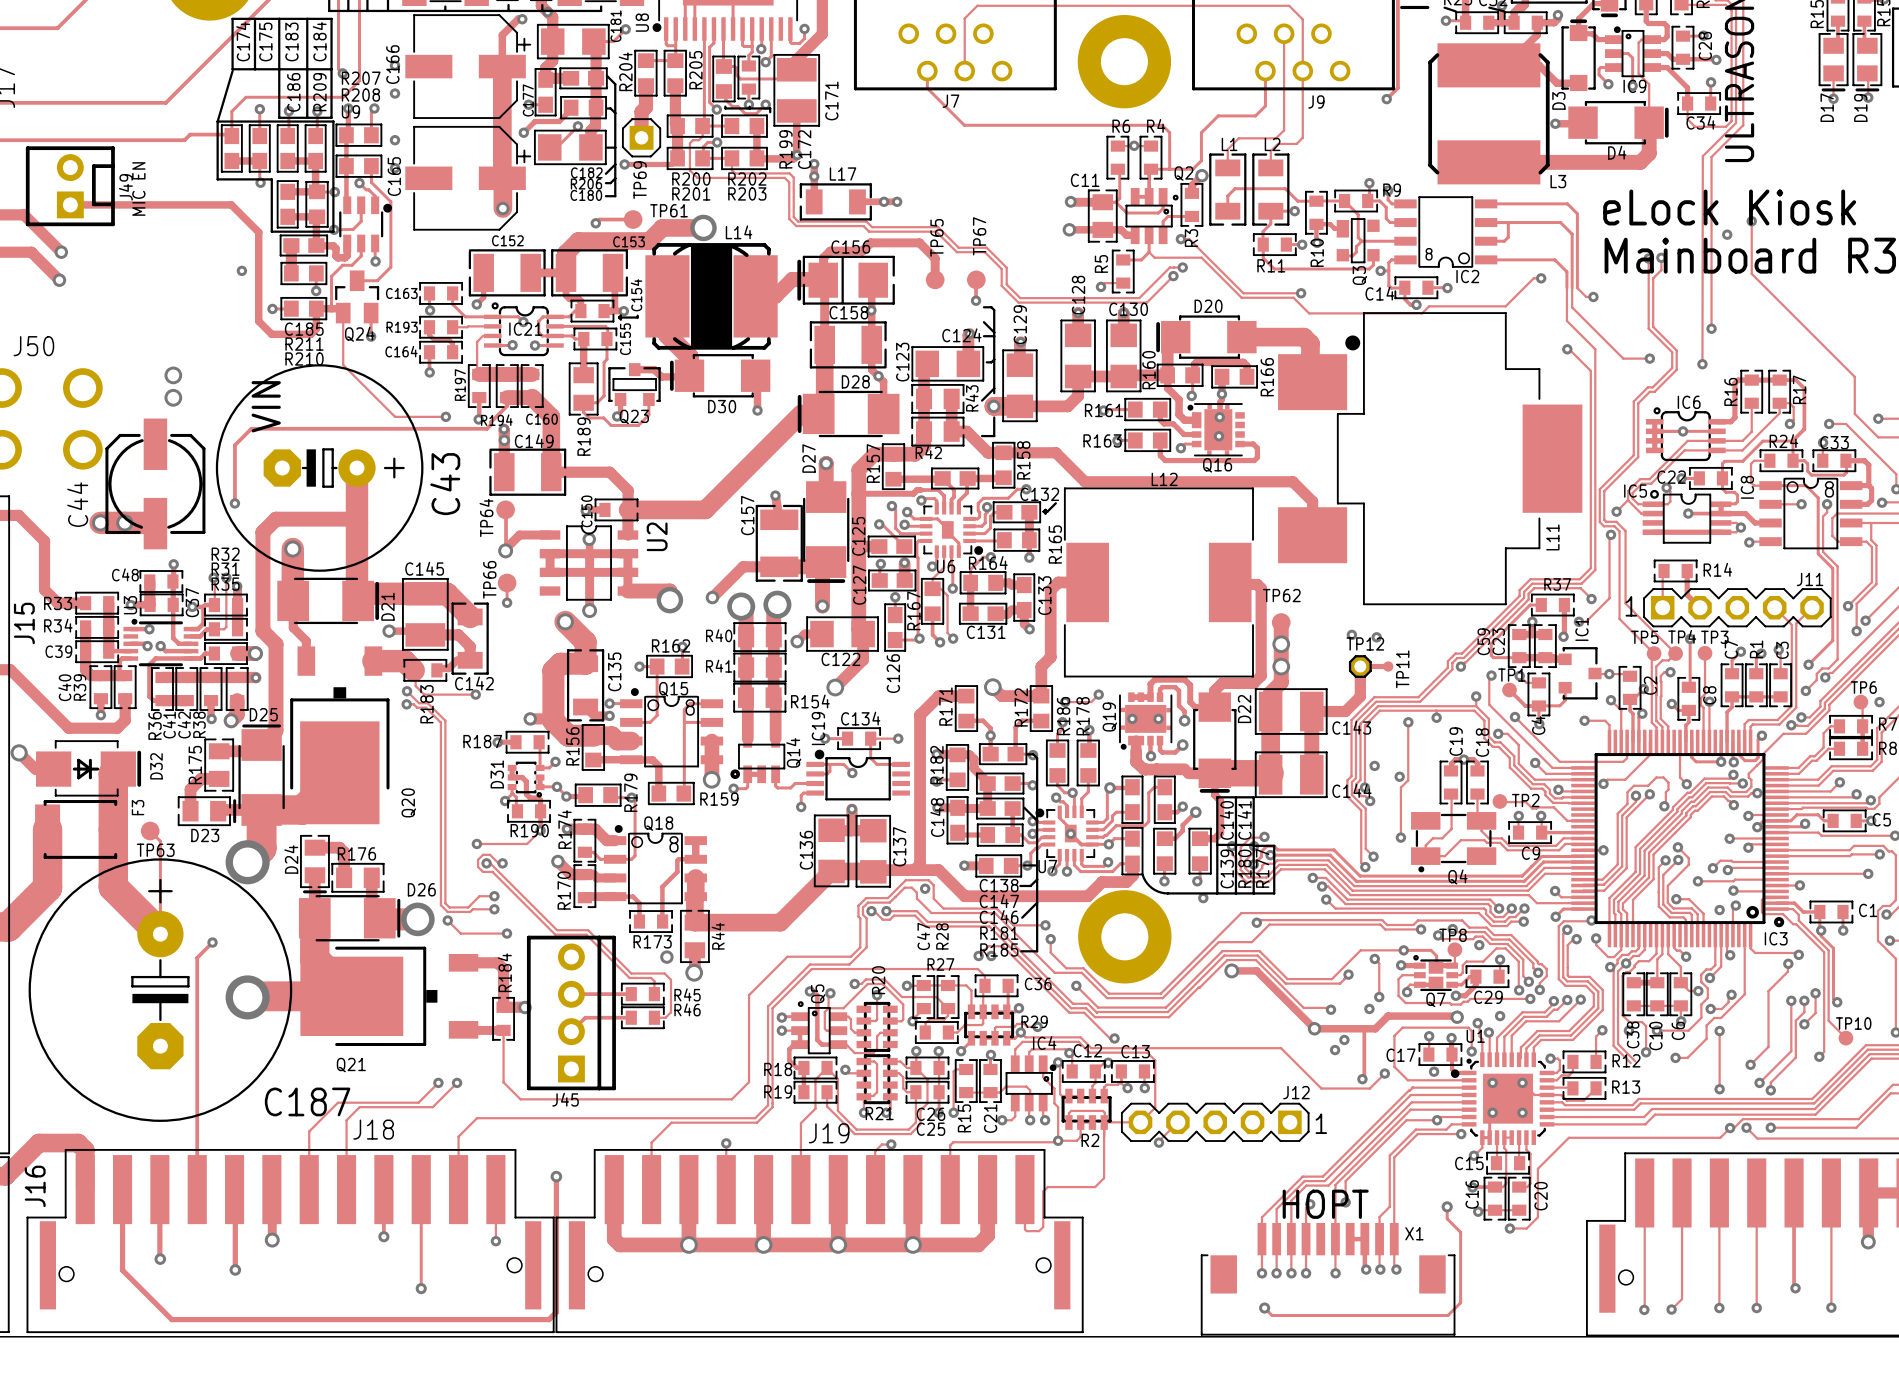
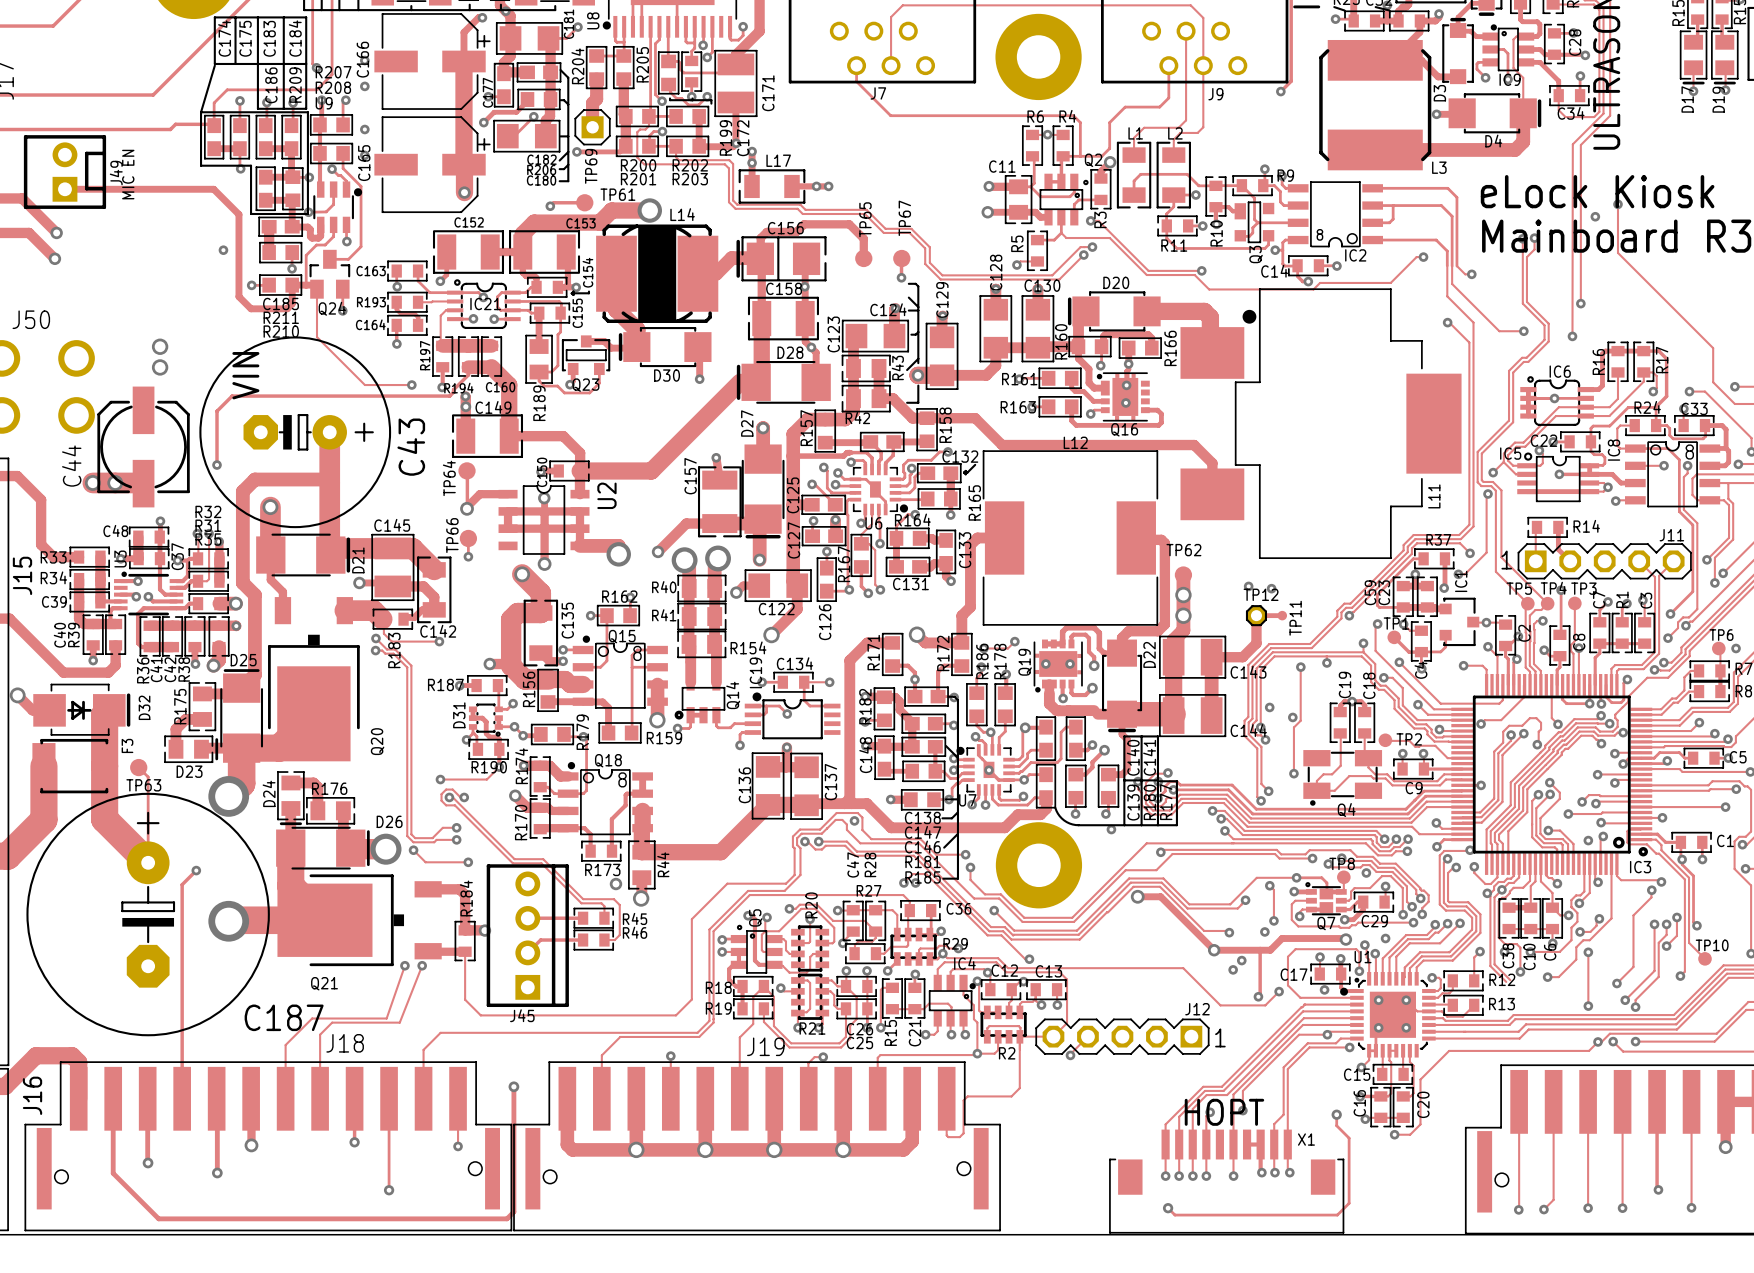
via: none -> (404, 965)
via: none -> (422, 965)
track: (438, 1082) (418, 1102) -> (404, 965) (386, 1018)
via: (438, 1082) -> none
track: (457, 1082) (432, 1107) -> (422, 965) (399, 1022)
via: (457, 1082) -> none

